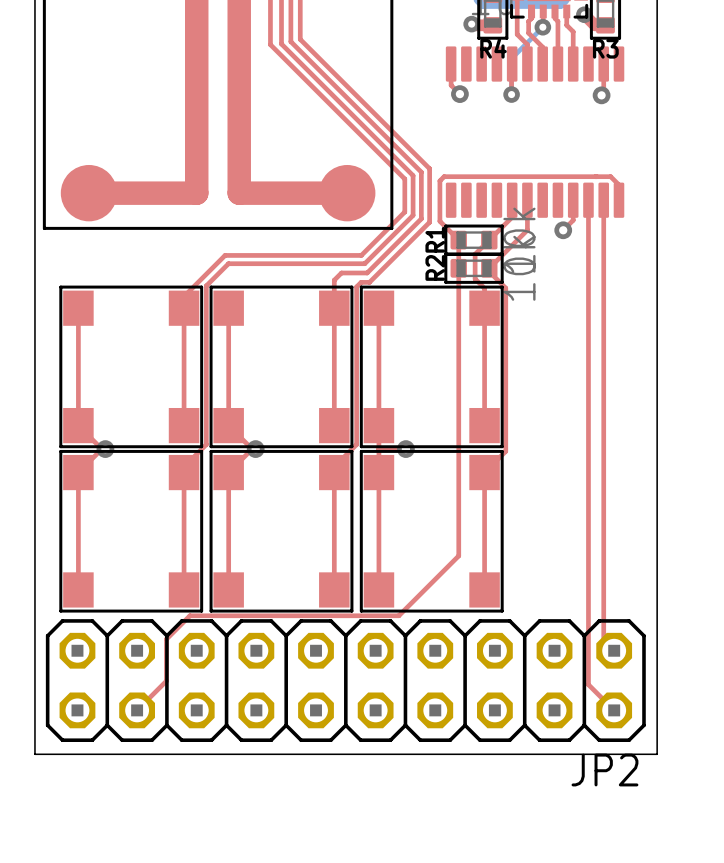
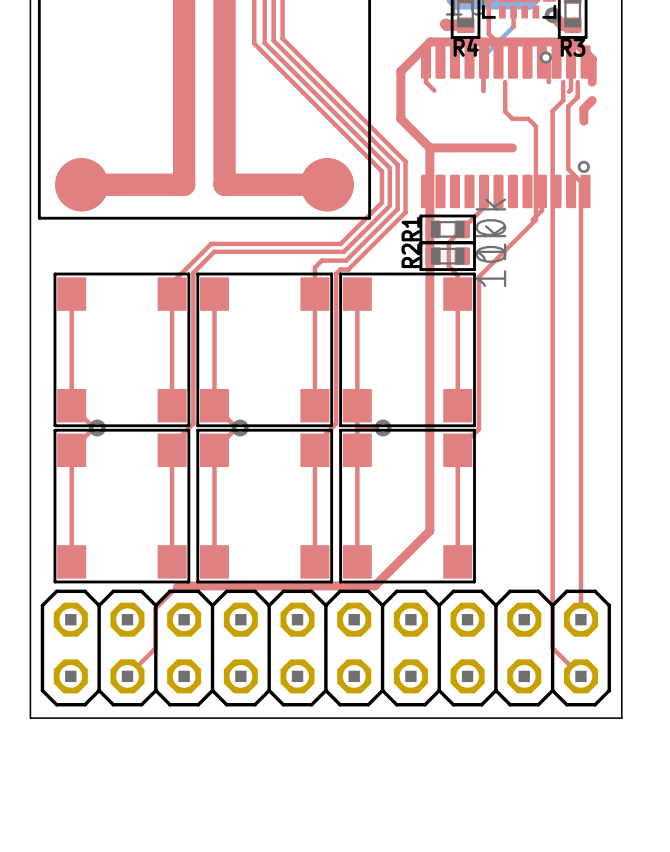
top track: (531, 11) (531, 18) (528, 21) (528, 33) (542, 47) (542, 64) -> none
top track: (555, 11) (555, 18) (557, 21) (557, 64) -> none
top track: (566, 11) (566, 25) (573, 31) (573, 64) -> none
via: (471, 24) -> none
via: (542, 27) -> none
top track: none -> (545, 57) (548, 60) (548, 82)
via: none -> (545, 57)
top track: none -> (592, 82) (592, 59) (574, 41) (430, 41) (400, 71) (400, 118) (429, 147)
via: (459, 94) -> none
via: (511, 94) -> none
via: (601, 95) -> none
top track: none -> (592, 100) (583, 108) (583, 121)
top track: none -> (429, 147) (512, 147)
via: none -> (583, 166)
top track: (527, 200) (527, 230) (489, 268) (489, 271) (505, 288) (505, 451) -> (505, 82) (505, 111) (512, 118) (528, 118) (535, 126) (535, 219) (478, 276) (477, 430)
top track: (588, 200) (588, 684) -> (563, 82) (563, 100) (552, 111) (552, 648) (556, 651)
top track: (603, 200) (603, 640) (614, 650) -> (577, 82) (577, 97) (568, 106) (568, 169) (580, 181) (580, 619)
top track: (618, 200) (618, 184) (610, 176) (444, 176) (439, 180) (439, 221) (458, 240) (458, 555) (398, 615) (189, 615) -> (429, 147) (429, 530) (374, 585) (177, 586)
via: (563, 230) -> none
JP2 name: JP2 (604, 770) -> none

